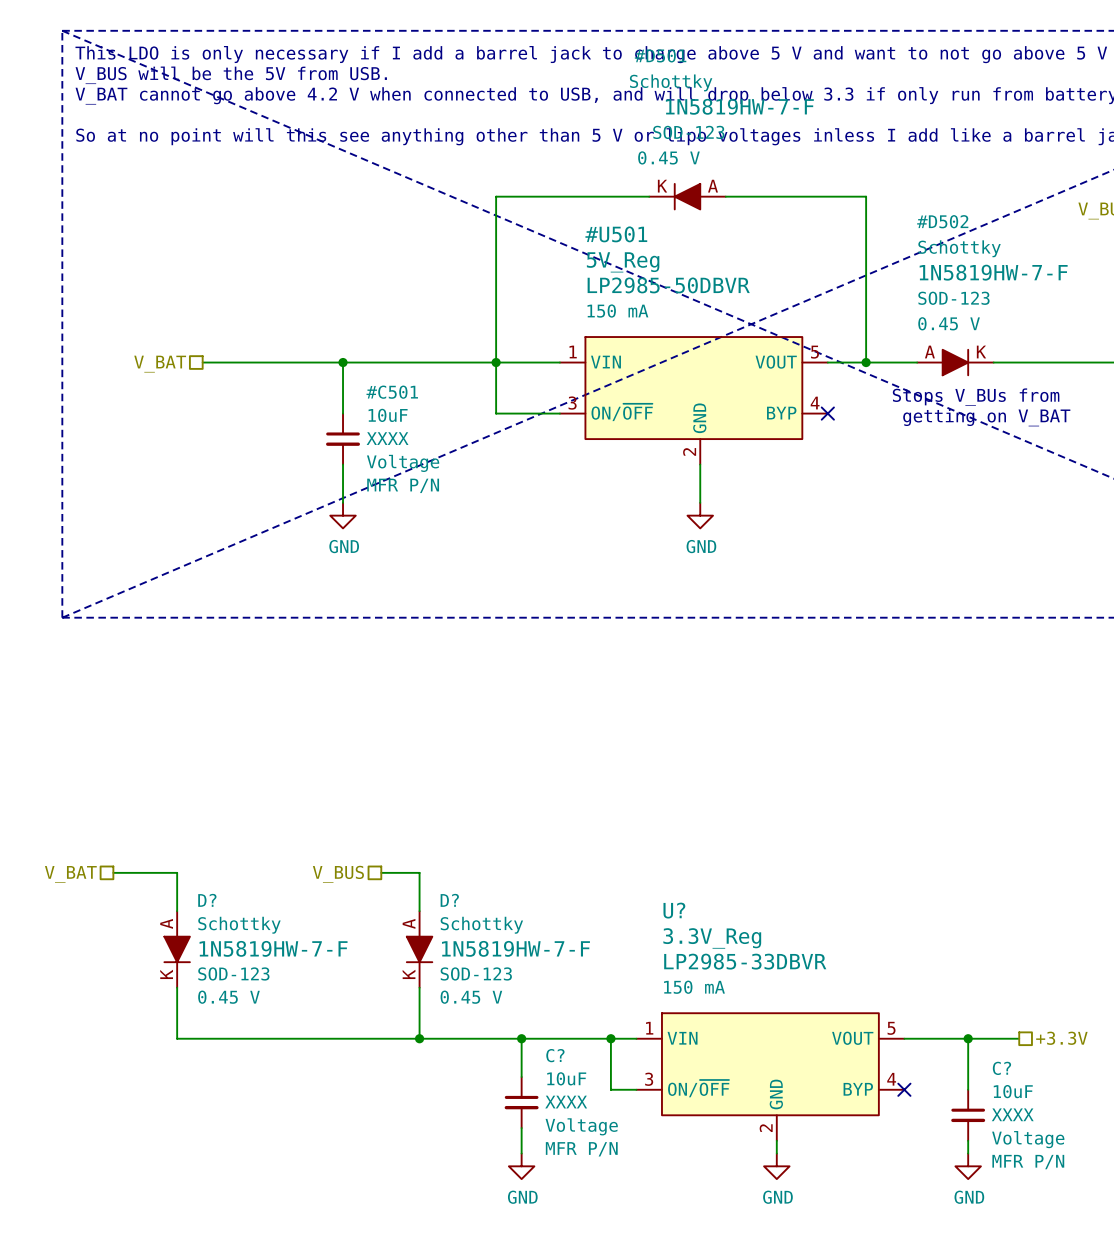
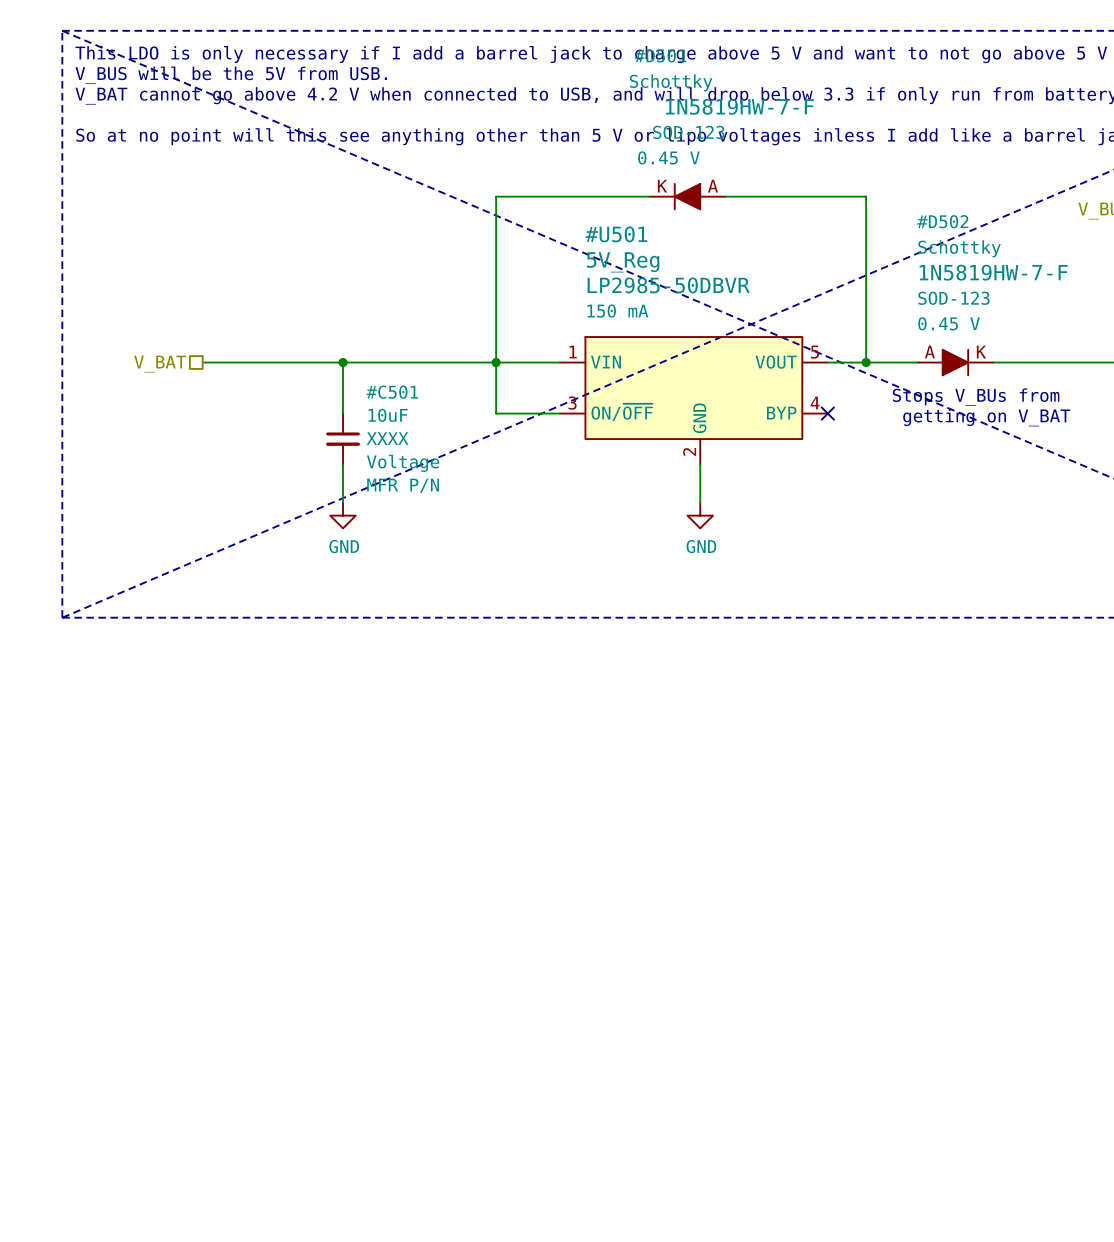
wire: (113, 872) (177, 872) (177, 911) -> none
wire: (381, 872) (419, 872) (419, 911) -> none
hierarchical label: V_BAT (70, 874) -> none
hierarchical label: V_BUS (338, 874) -> none
D?: Schottky (177, 949) -> none
D?: Schottky (419, 949) -> none
wire: (177, 987) (177, 1038) (636, 1038) -> none
wire: (419, 987) (419, 1038) -> none
junction: (419, 1038) -> none
wire: (521, 1038) (521, 1077) -> none
junction: (521, 1038) -> none
wire: (610, 1038) (610, 1089) (636, 1089) -> none
junction: (610, 1038) -> none
wire: (904, 1038) (1019, 1038) -> none
wire: (968, 1038) (968, 1089) -> none
junction: (968, 1038) -> none
hierarchical label: +3.3V (1061, 1038) -> none
U?: 3.3V_Reg (770, 1077) -> none
no-connect mark: (904, 1089) -> none
C?: 10uF (521, 1102) -> none
C?: 10uF (968, 1115) -> none
wire: (521, 1128) (521, 1153) -> none
wire: (776, 1140) (776, 1153) -> none
wire: (968, 1140) (968, 1153) -> none
power symbol: GND (521, 1166) -> none
power symbol: GND (776, 1166) -> none
power symbol: GND (968, 1166) -> none

